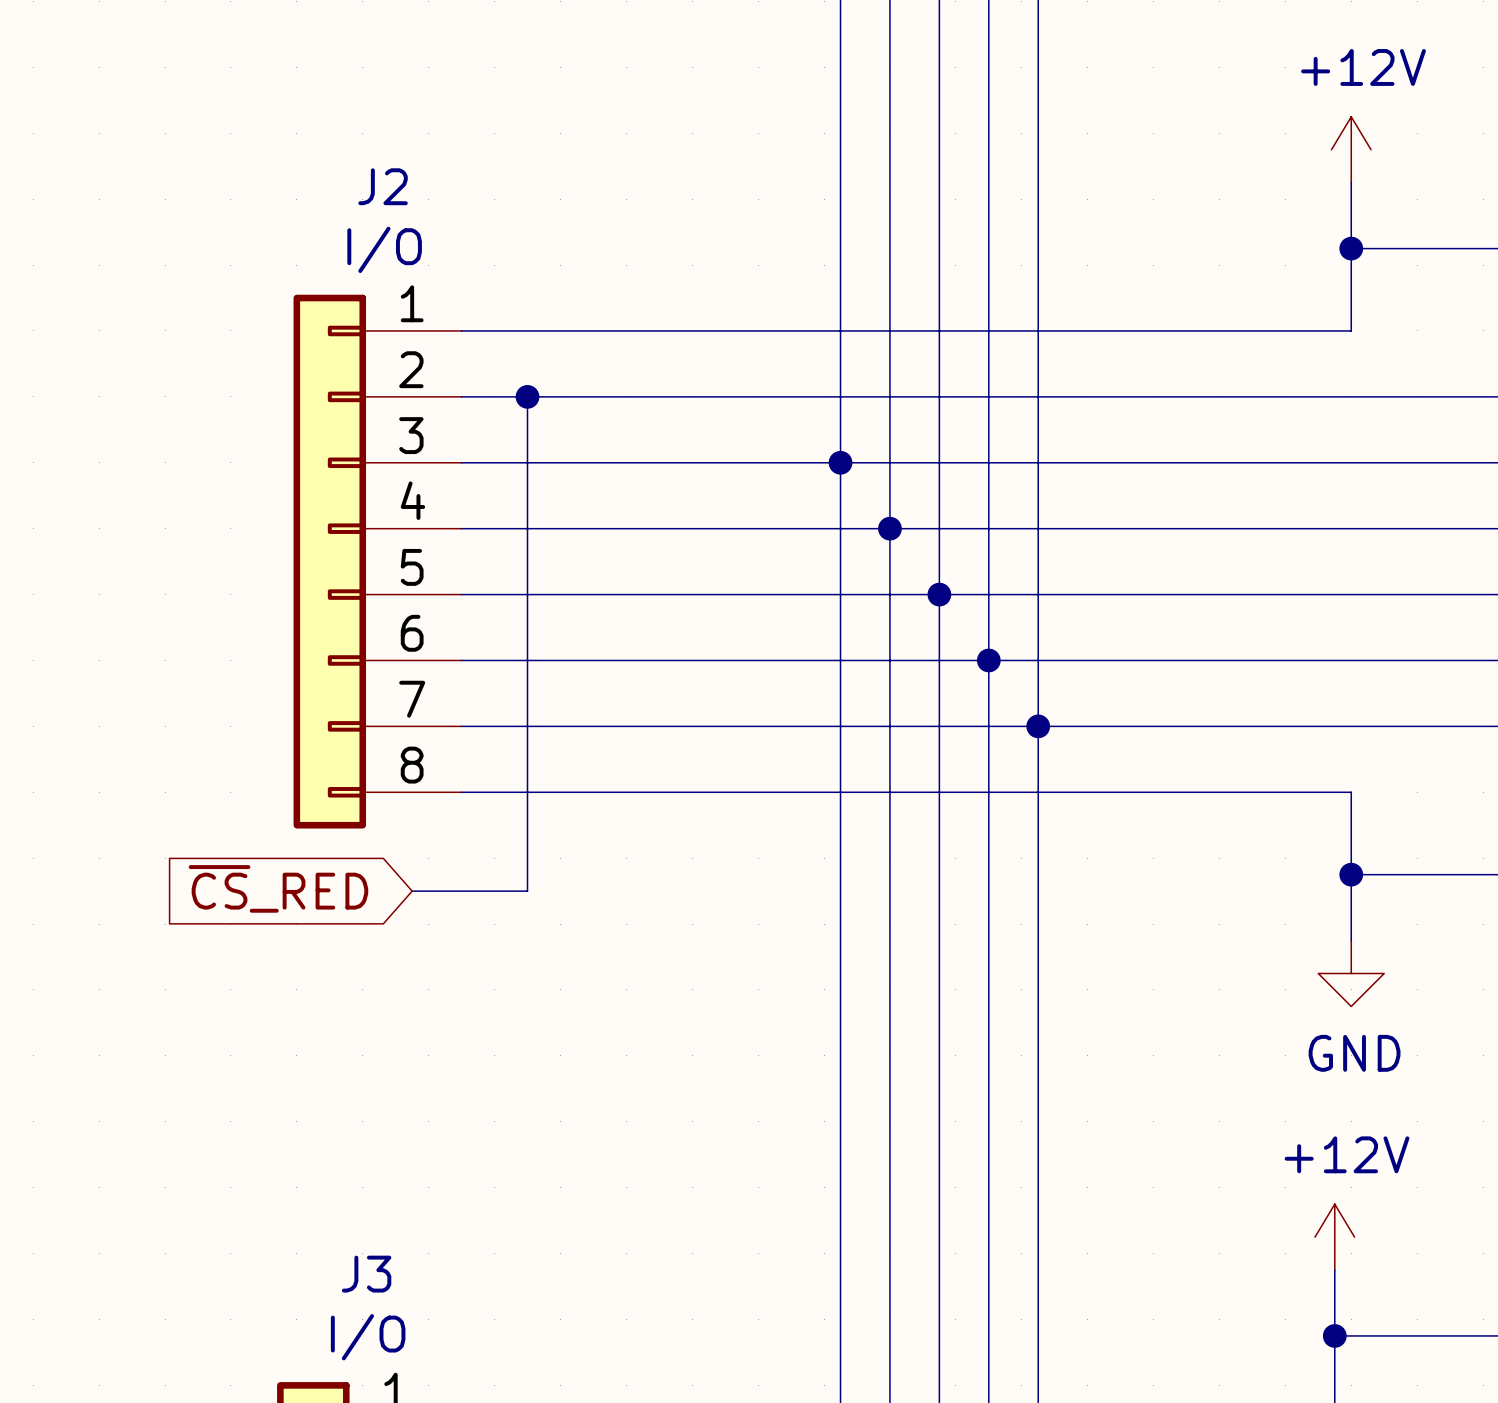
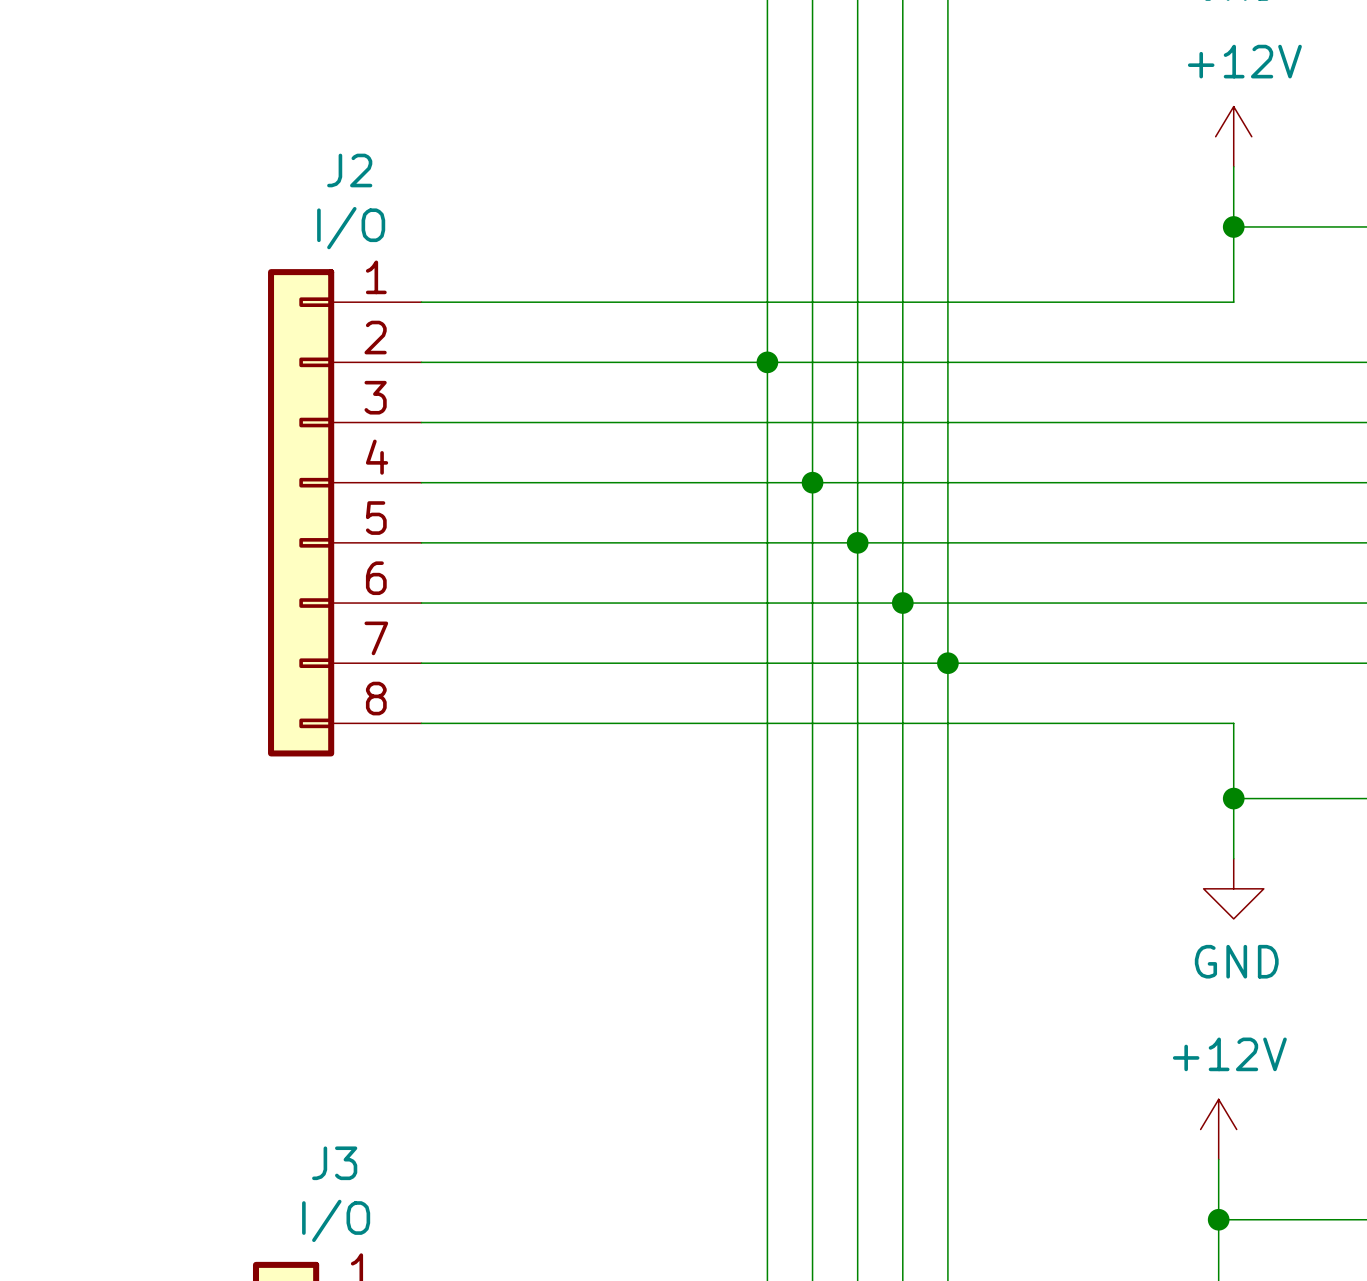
wire: (527, 396) (527, 891) (412, 891) -> none
junction: (527, 396) -> none
junction position: (840, 462) -> (767, 362)
global label: ~{CS}_RED (278, 888) -> none

